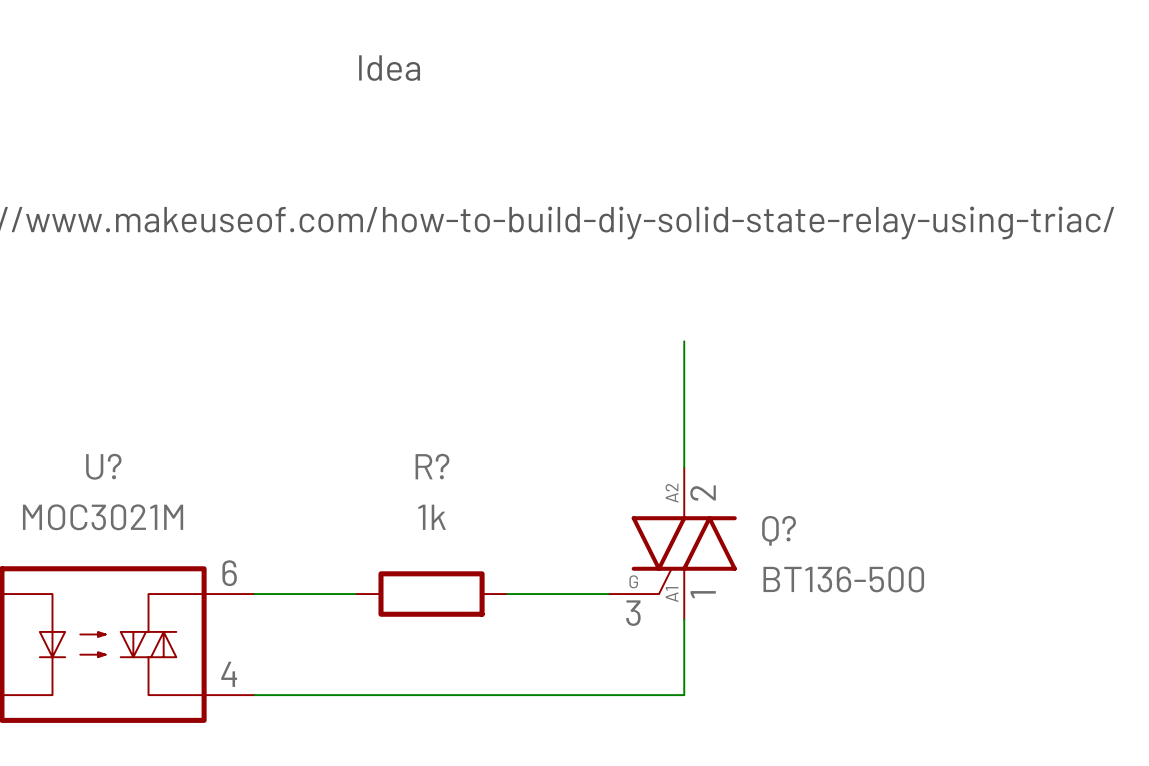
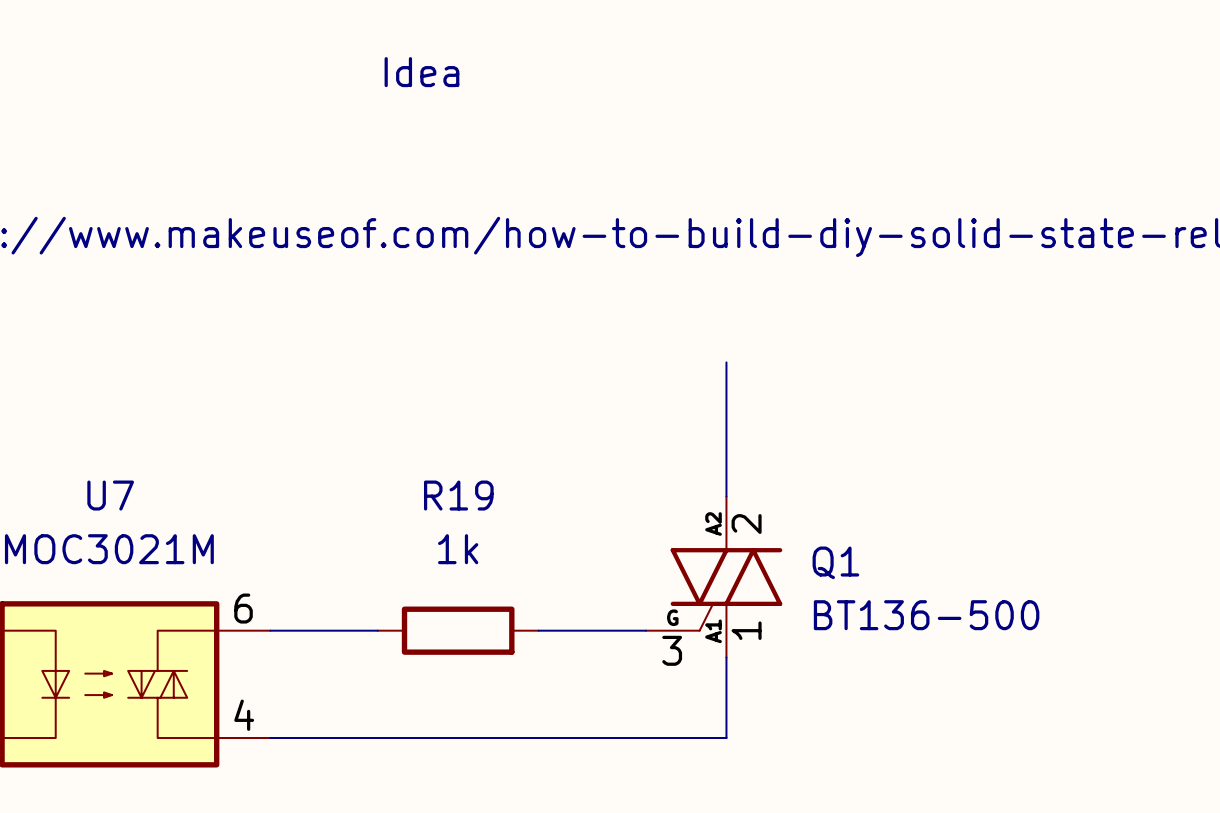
U? name: U? (103, 466) -> U7 (110, 495)
R? name: R? (432, 466) -> R19 (458, 495)
Q? name: Q? (779, 530) -> Q1 (835, 562)

